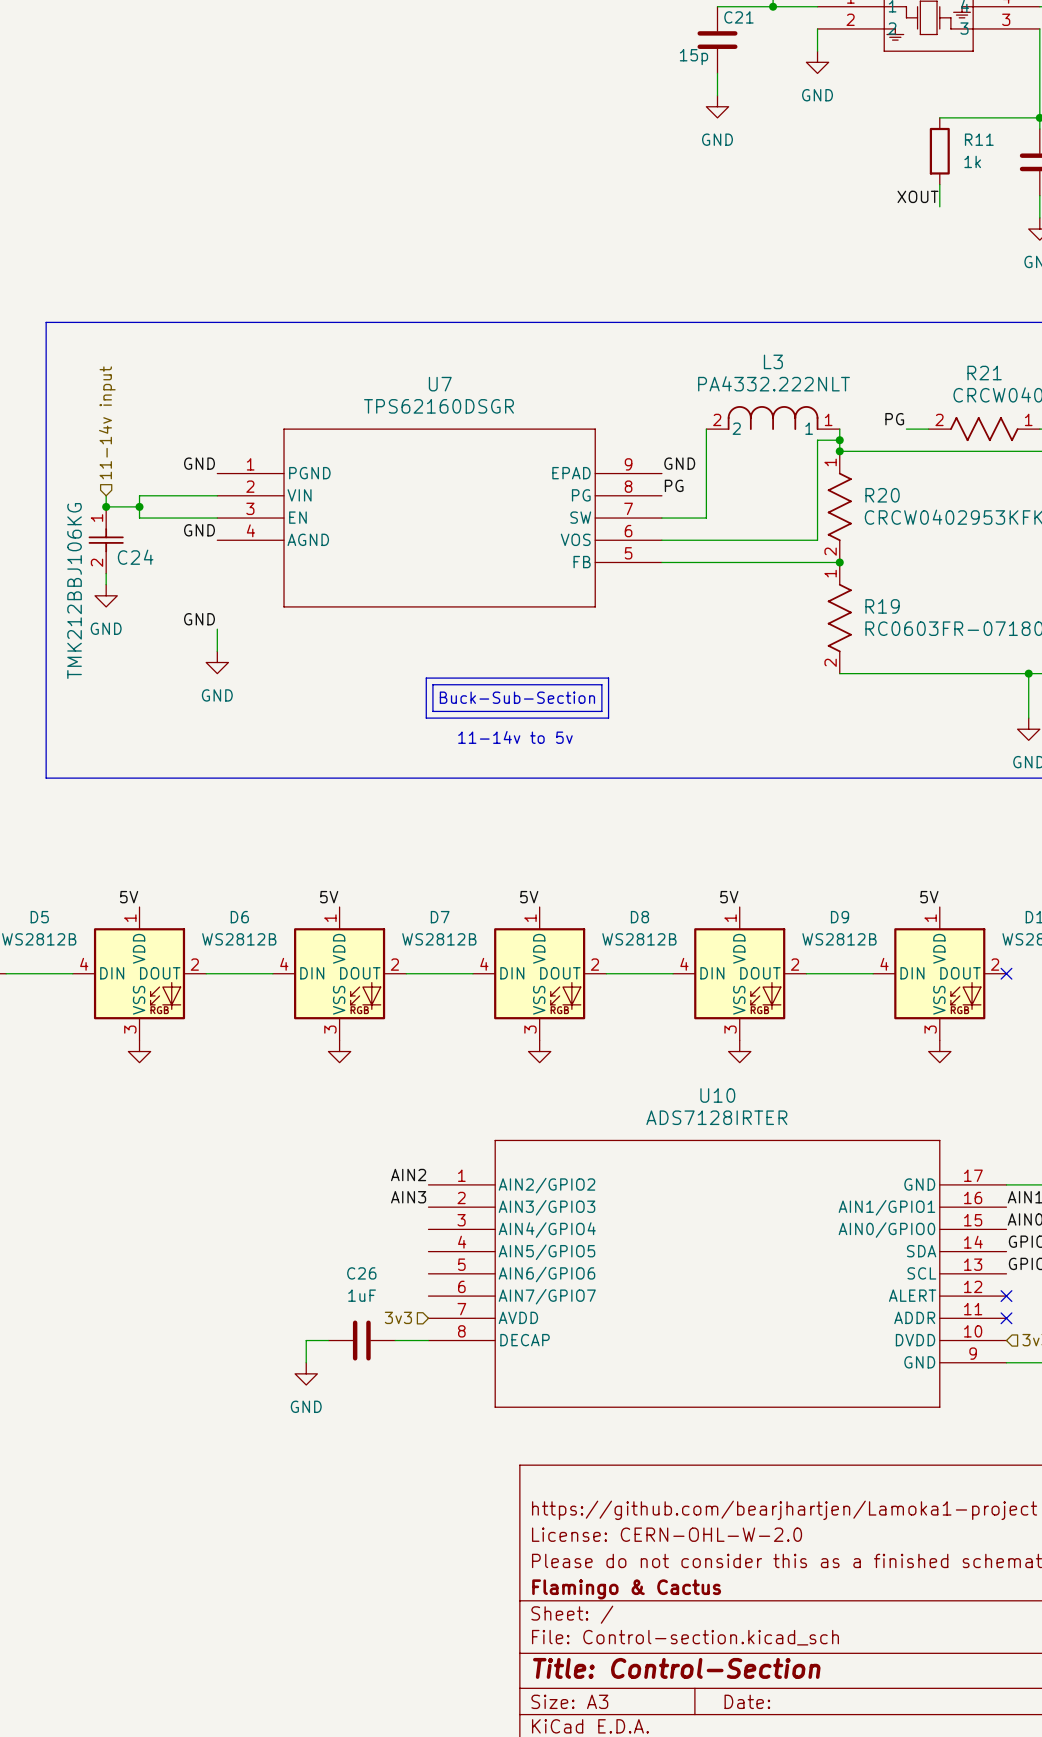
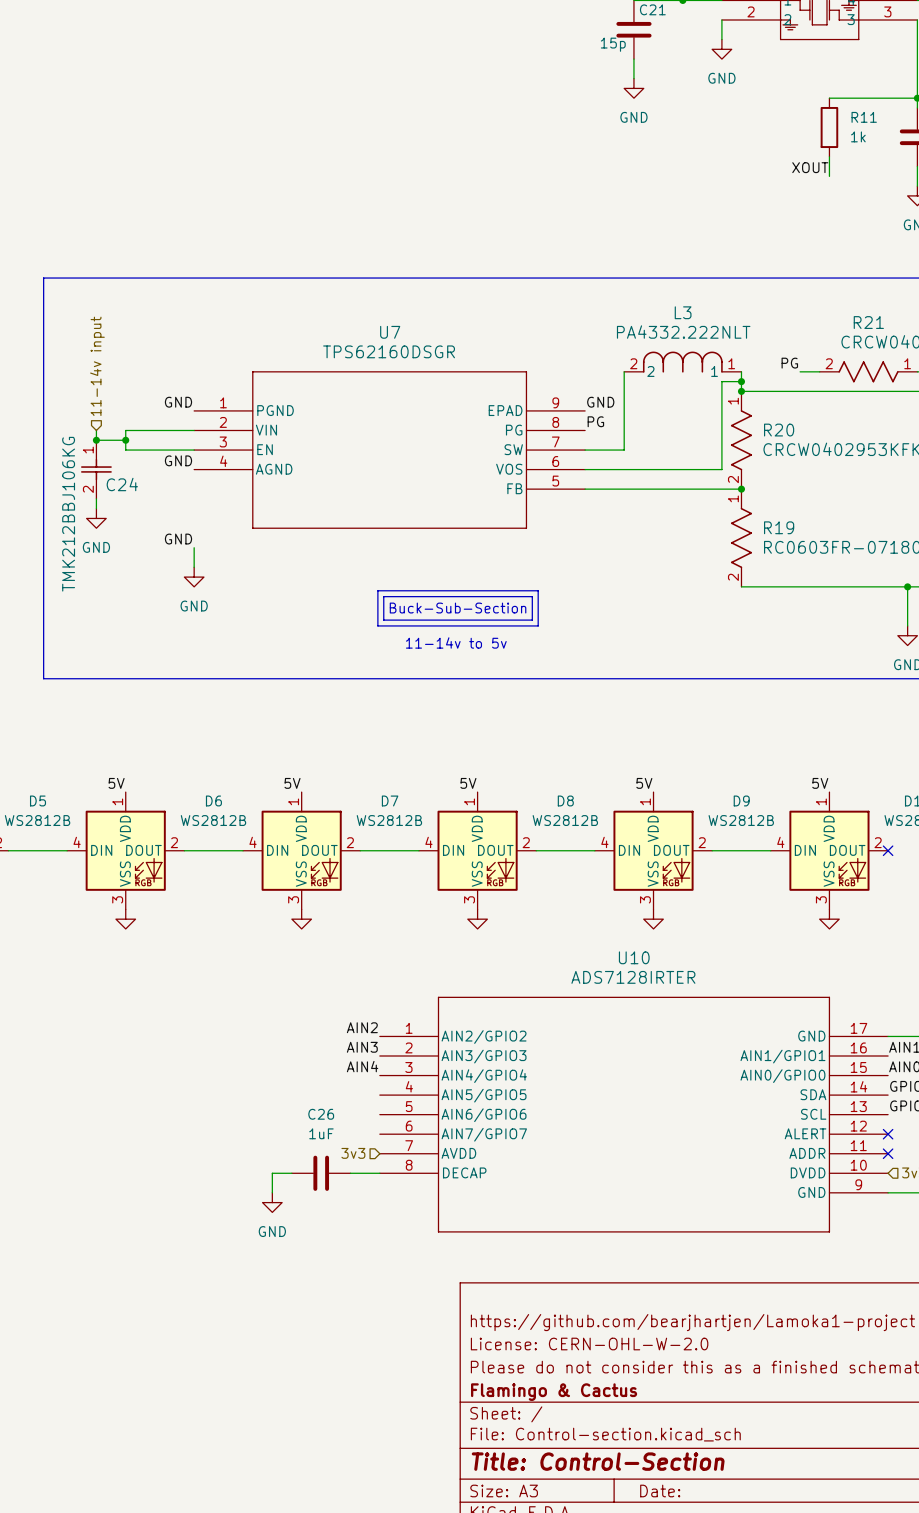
label: none -> AIN4 (362, 1066)

